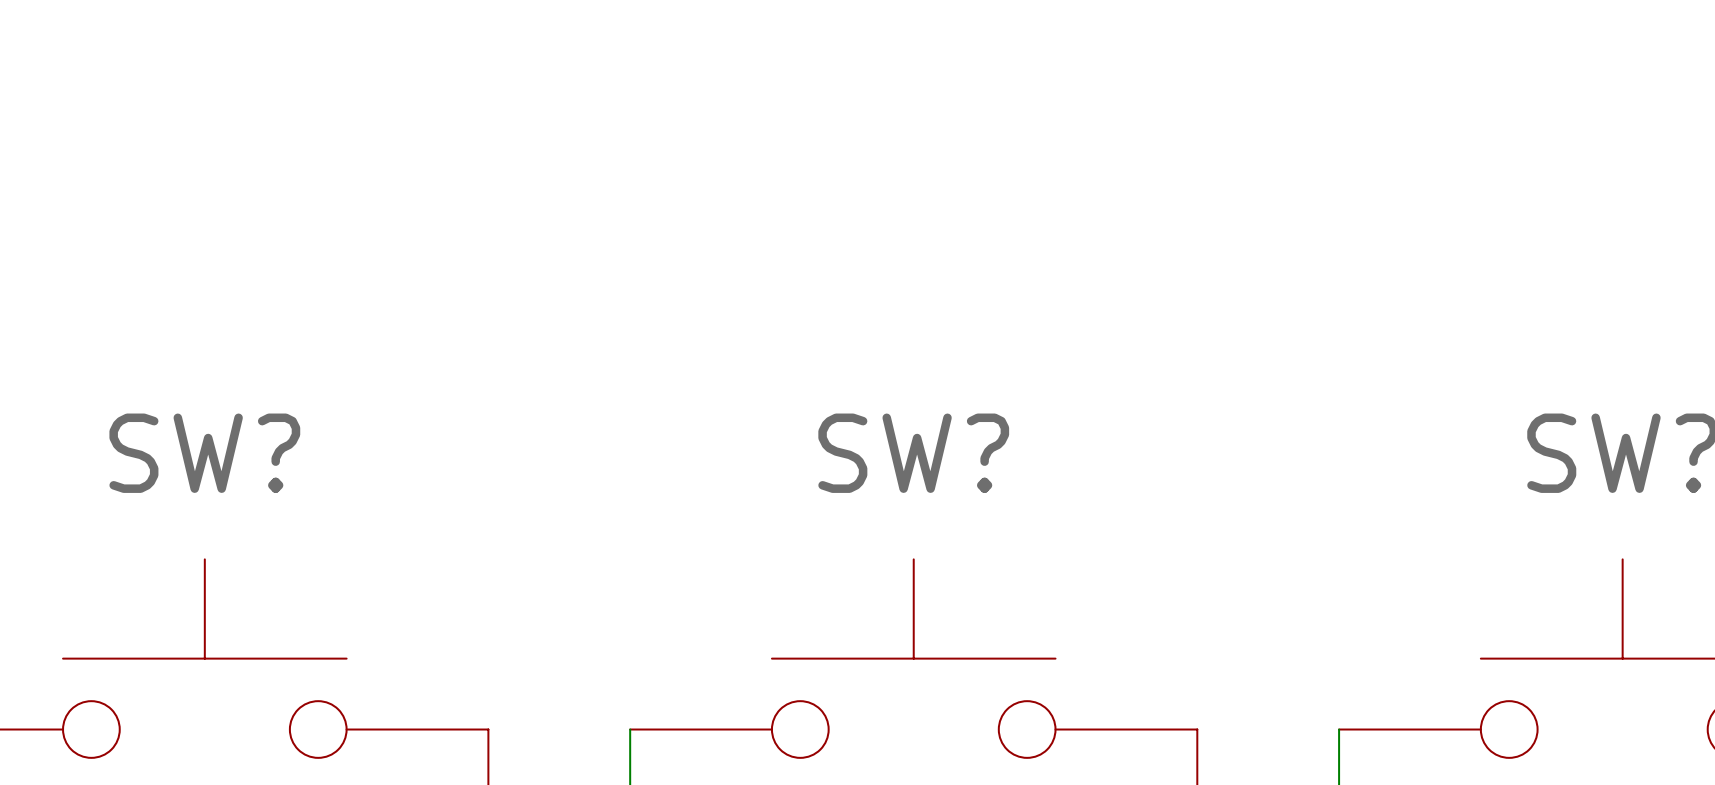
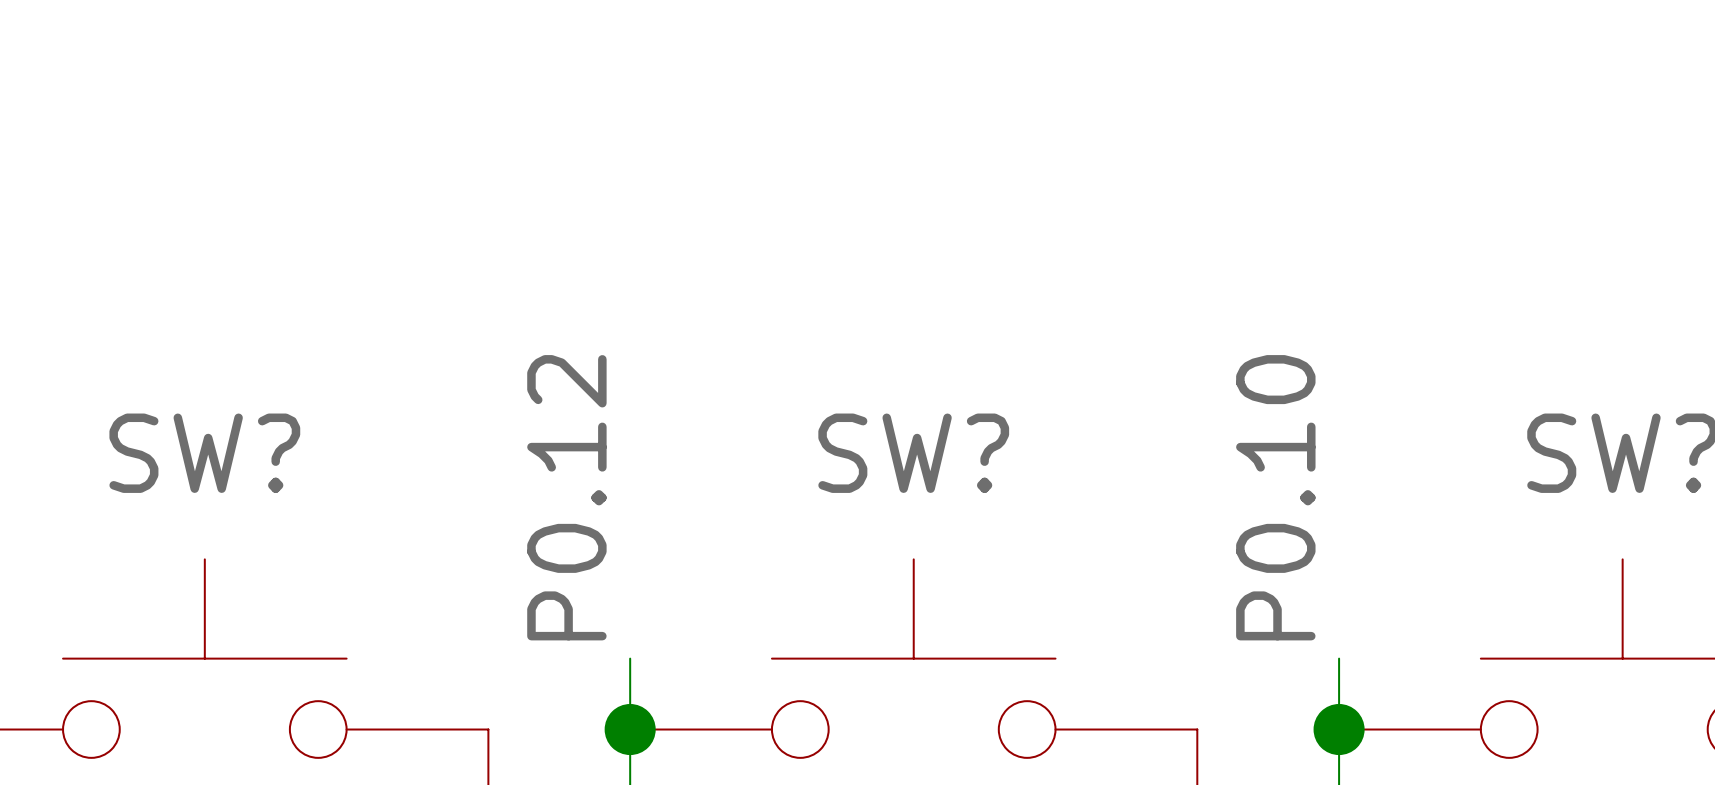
label: none -> P0.12 (566, 497)
label: none -> P0.10 (1275, 497)
wire: none -> (630, 658) (630, 729)
wire: none -> (1339, 658) (1339, 729)
junction: none -> (630, 729)
junction: none -> (1339, 729)

